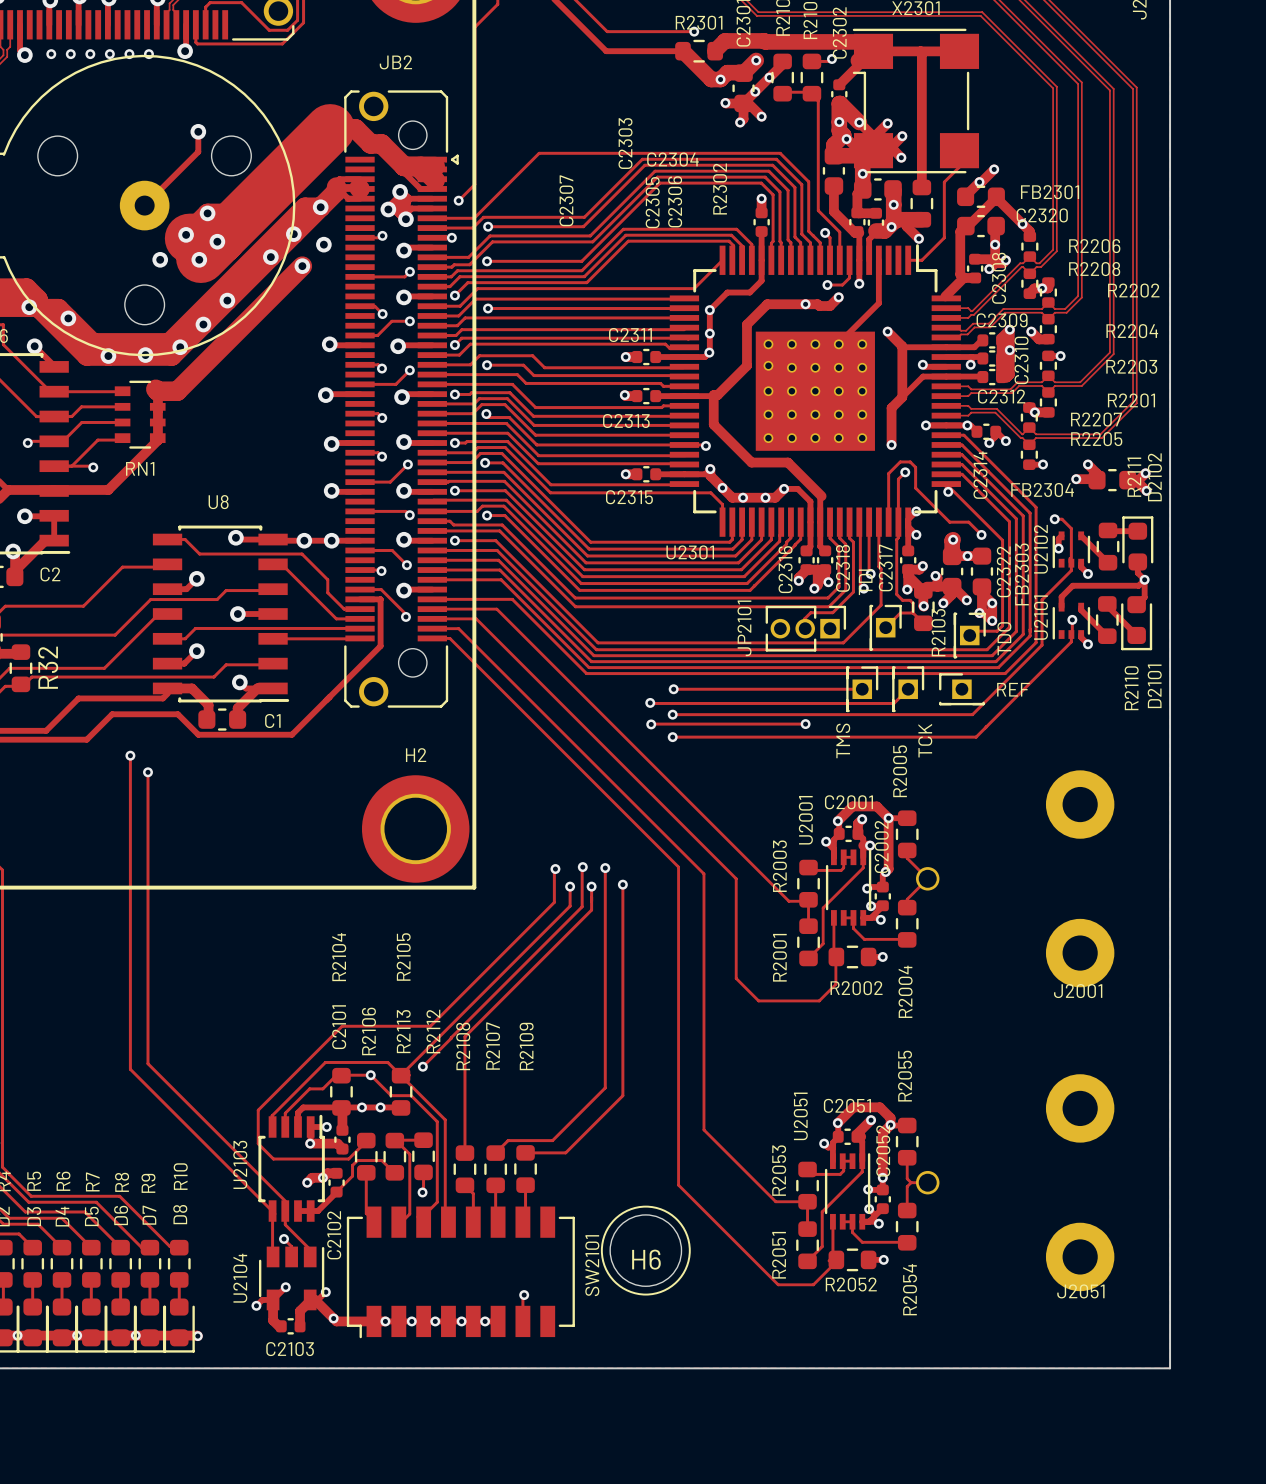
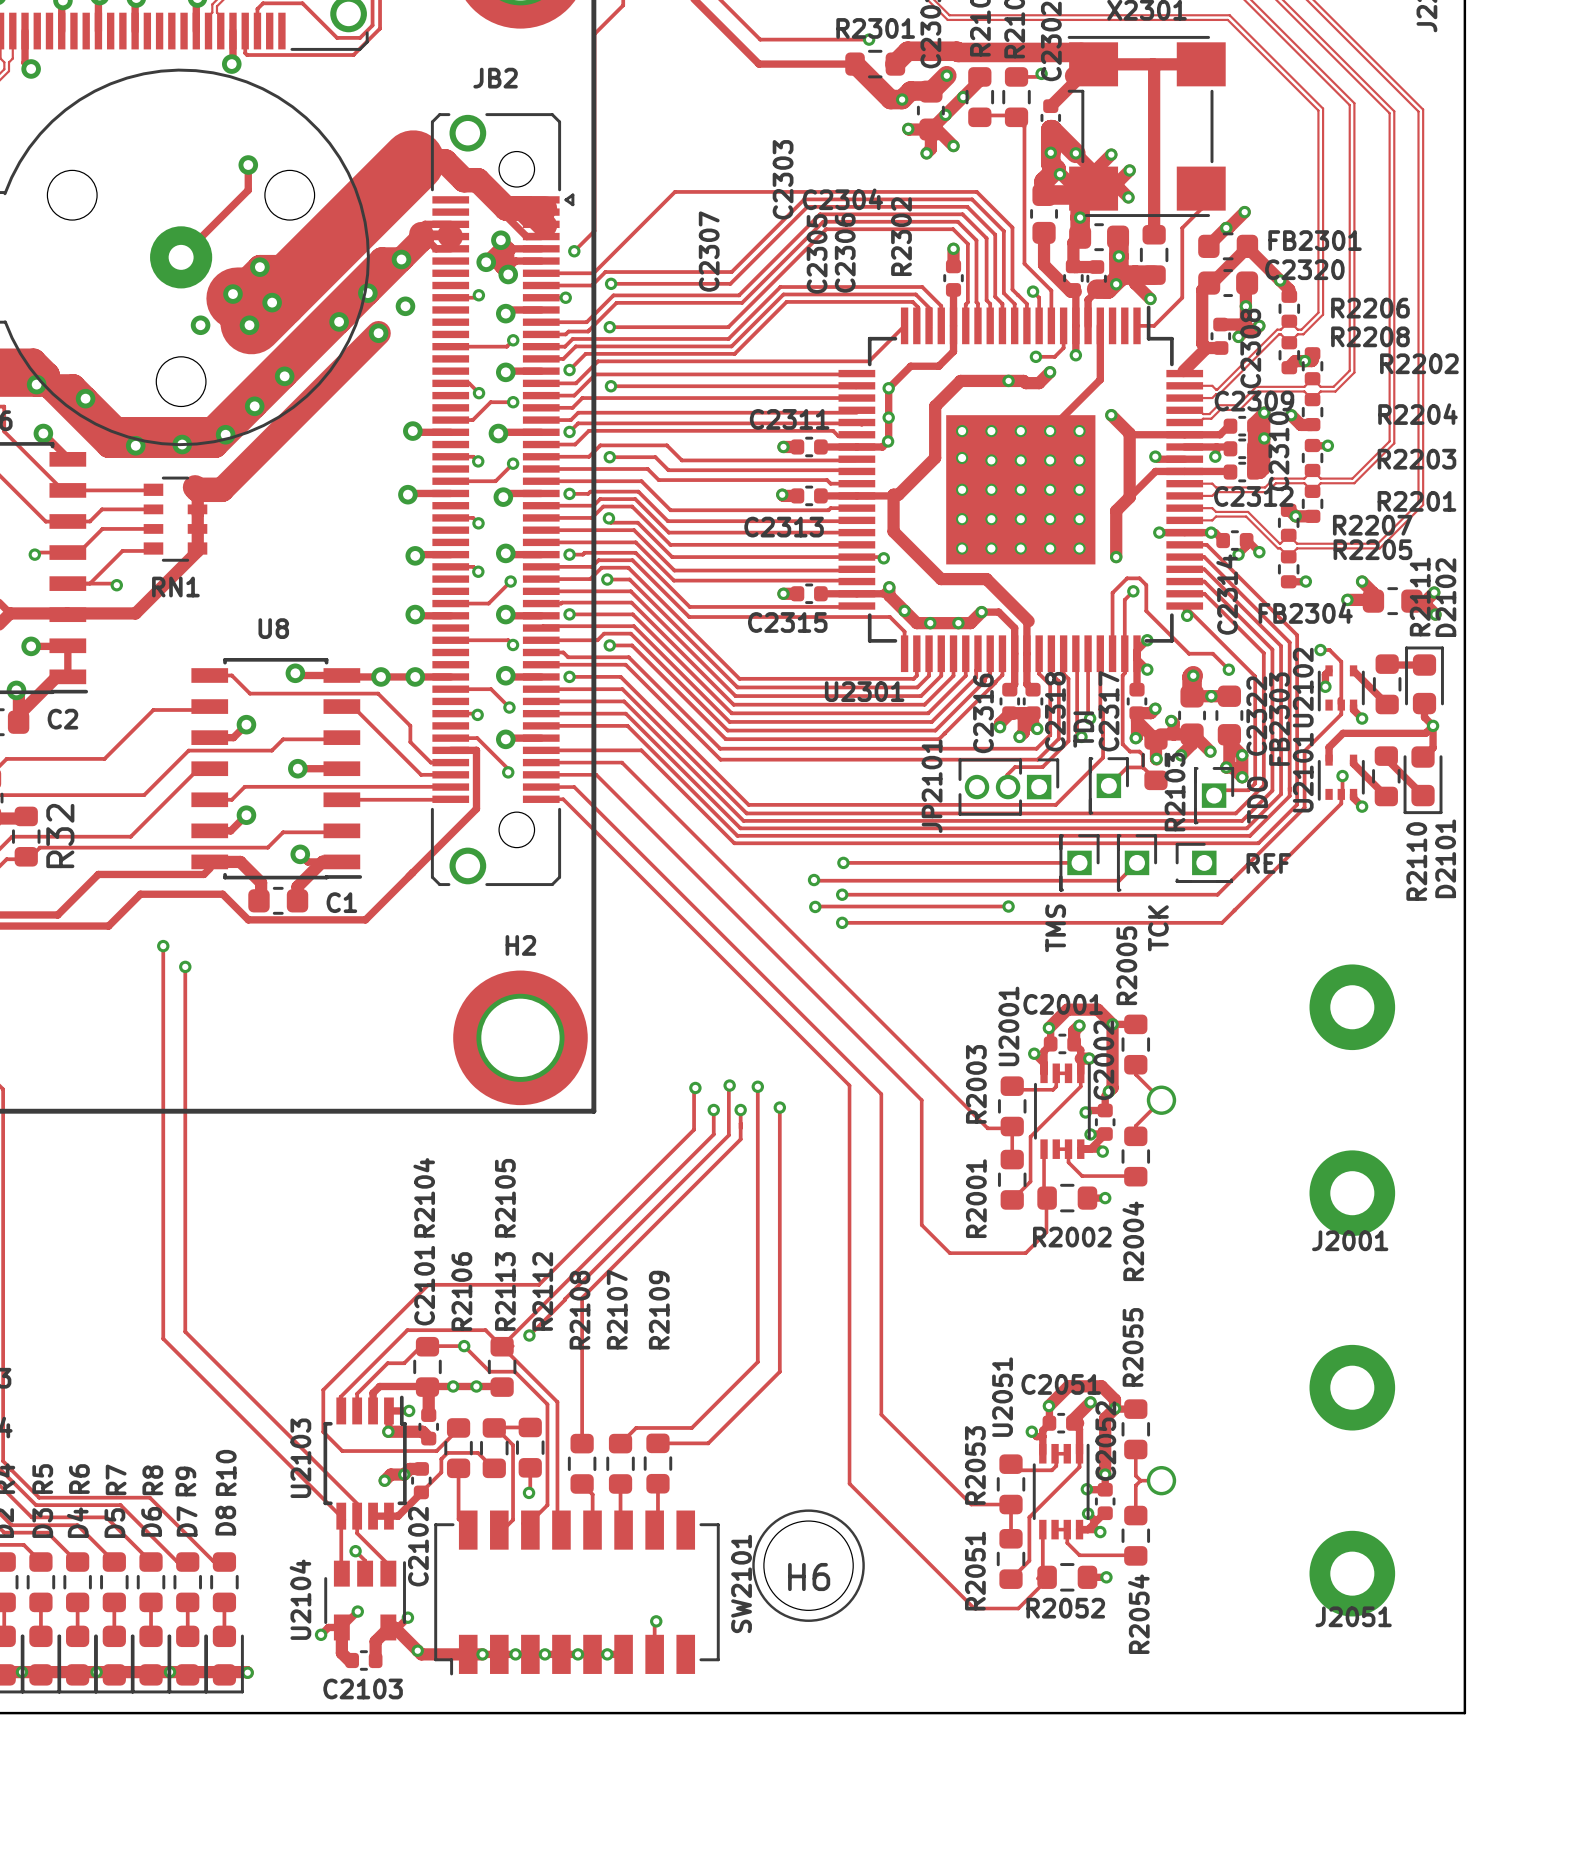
via: (51, 54) -> none
via: (70, 54) -> none
via: (90, 54) -> none
via: (109, 54) -> none
via: (129, 54) -> none
via: (148, 54) -> none

